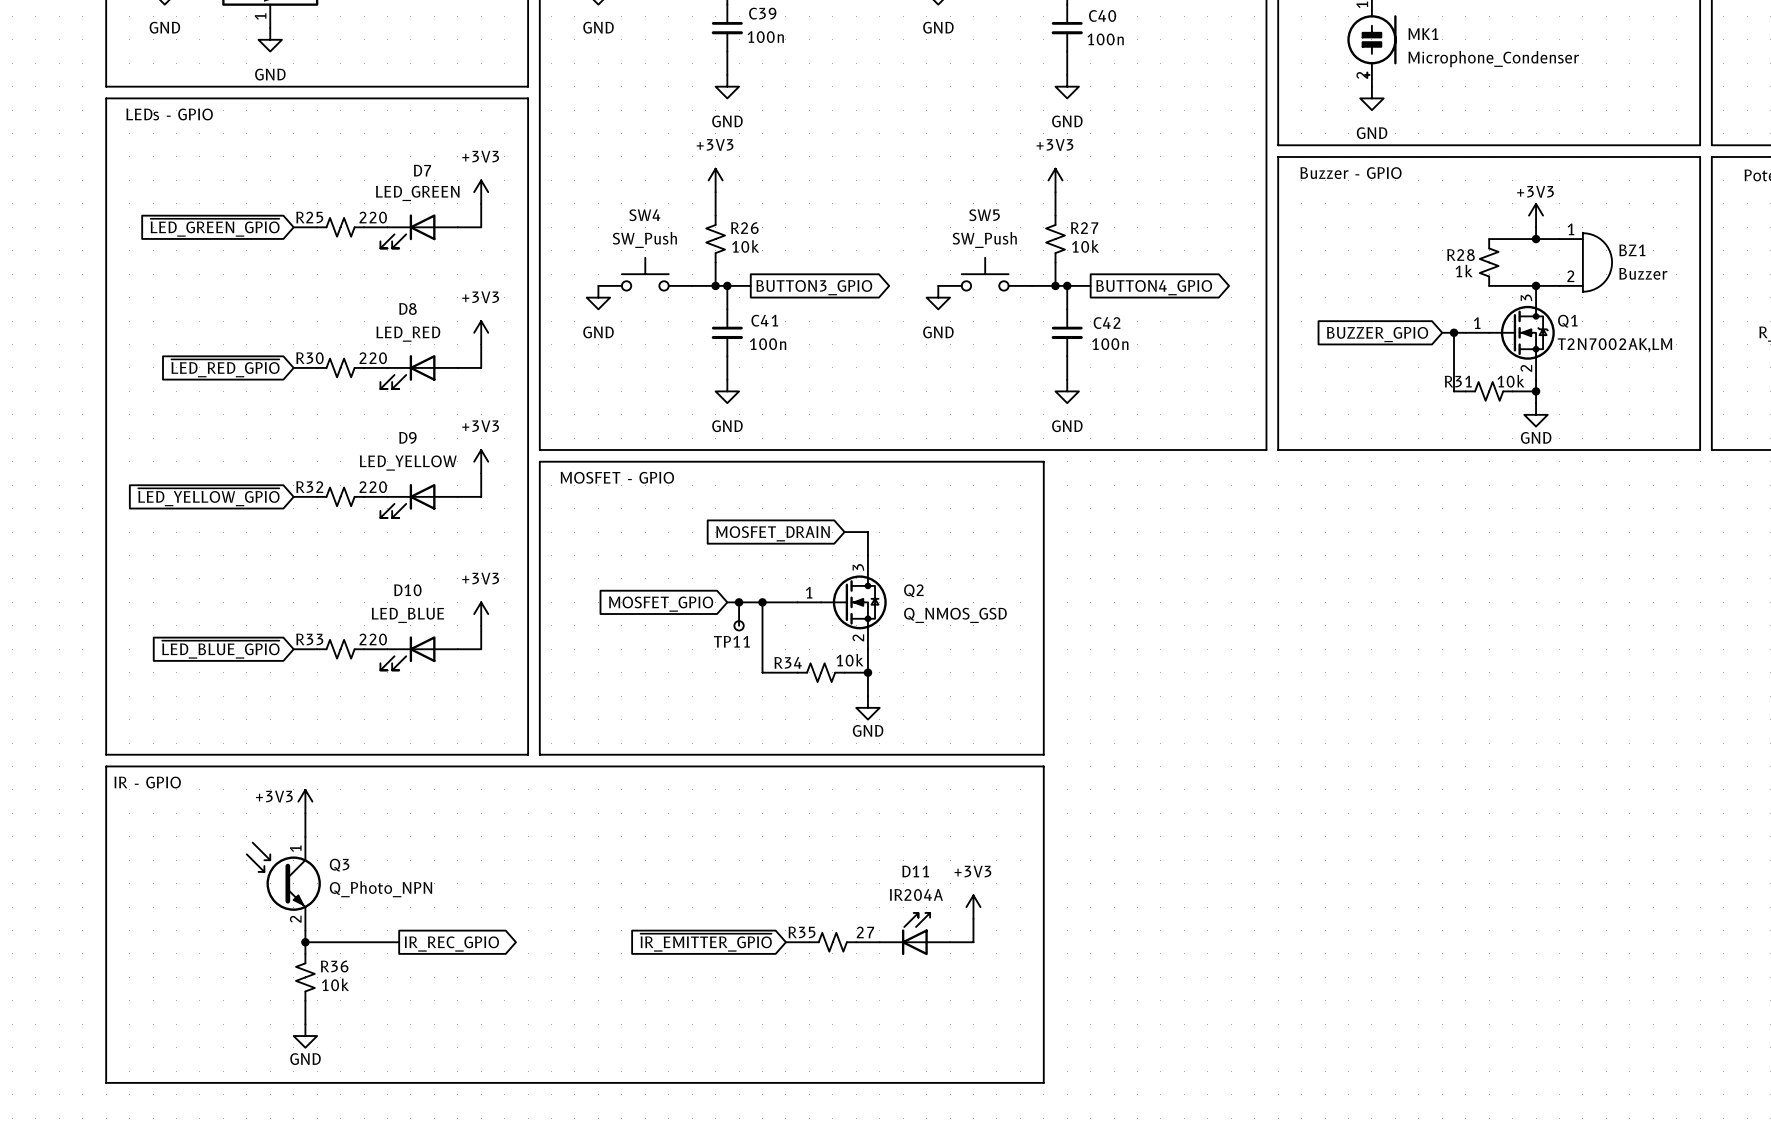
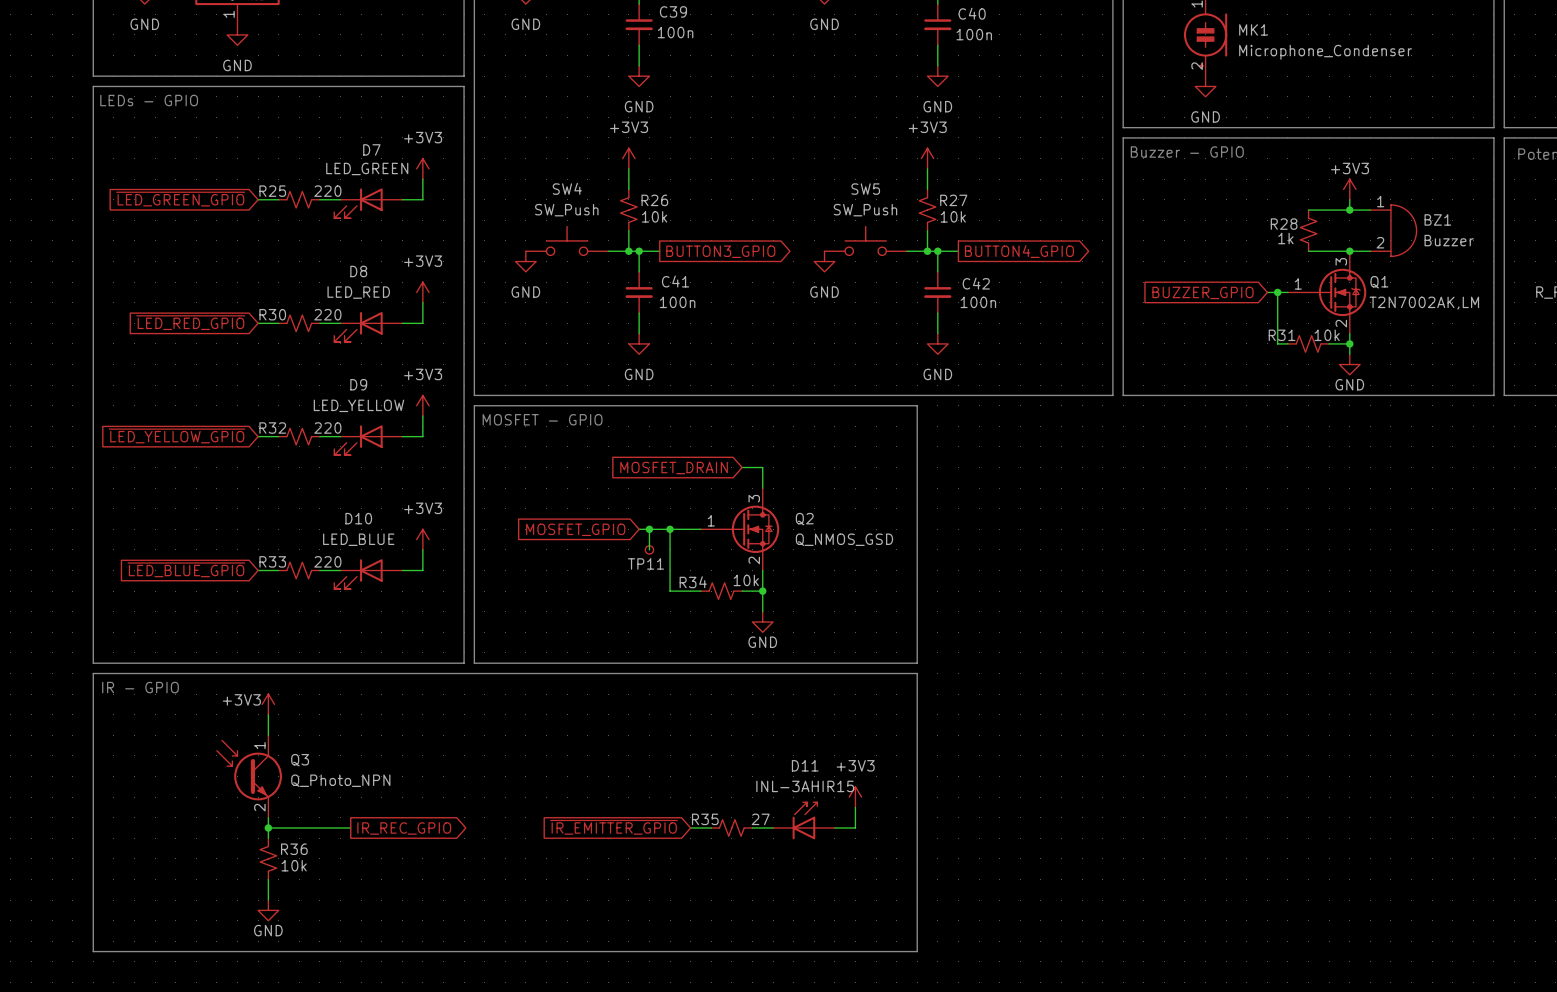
D11 value: IR204A (916, 895) -> INL-3AHIR15 (805, 786)

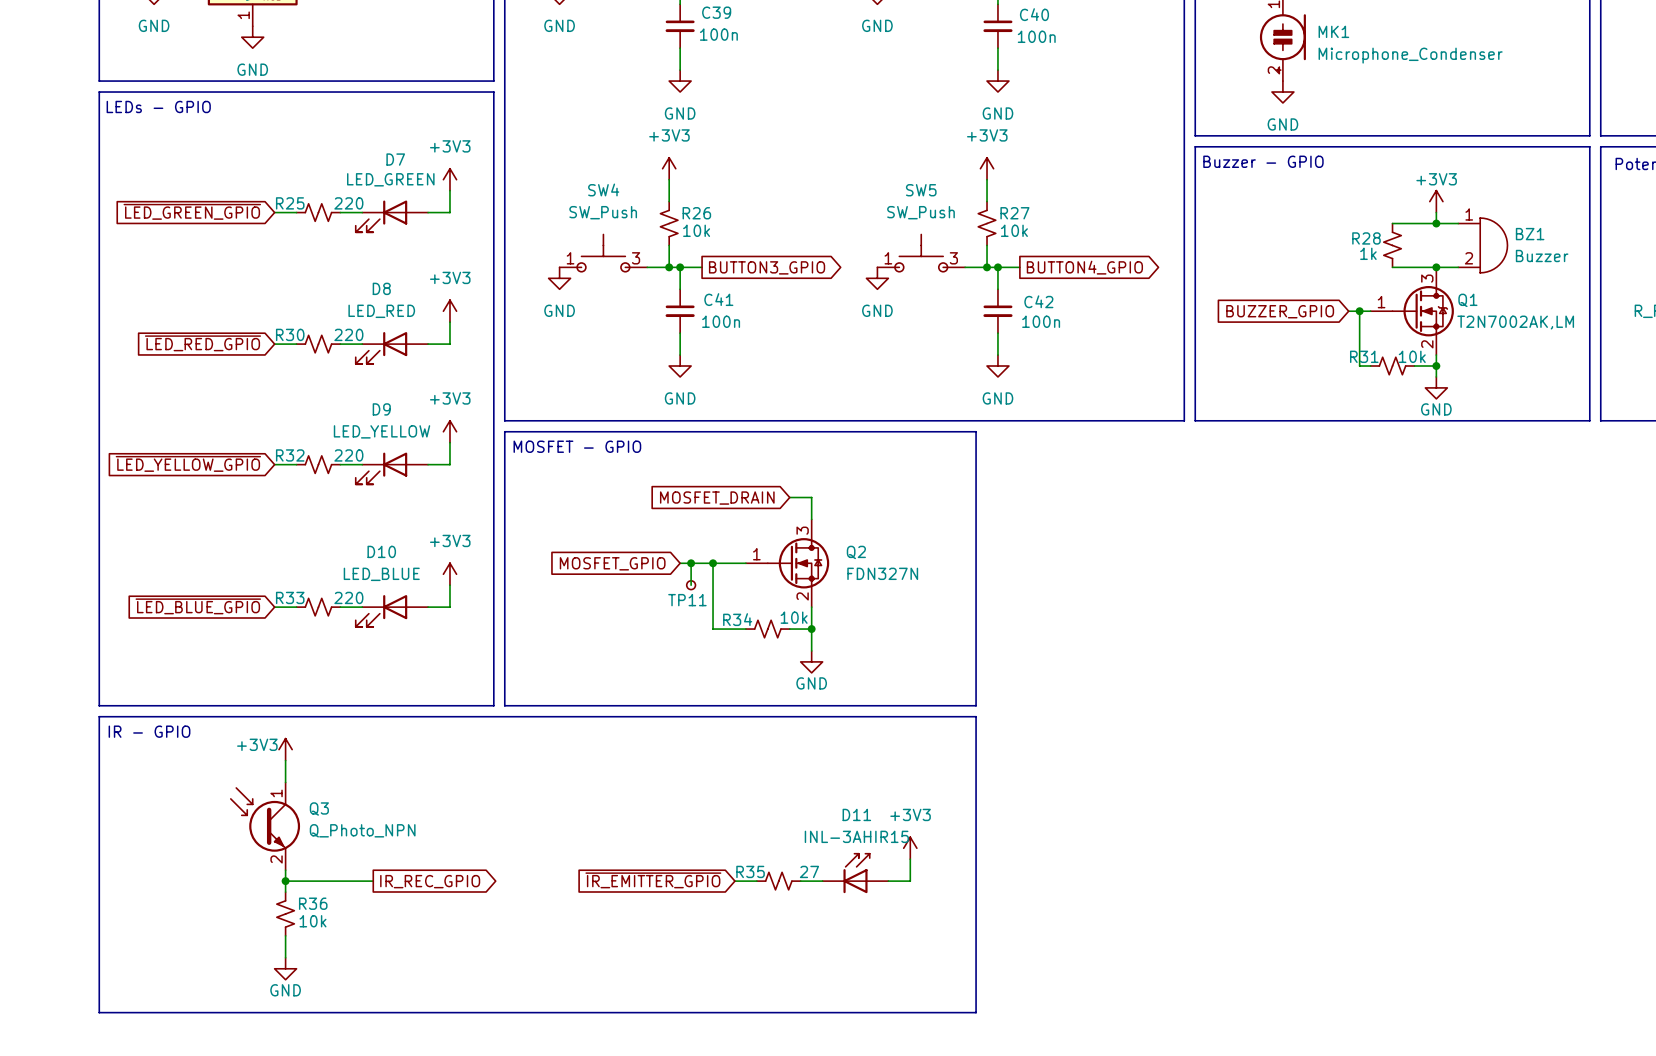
SW4 symbol: [525, 226, 609, 256] -> [559, 234, 648, 272]
SW5 symbol: [824, 226, 907, 256] -> [877, 234, 966, 272]
Q2 value: Q_NMOS_GSD (844, 539) -> FDN327N (882, 573)

